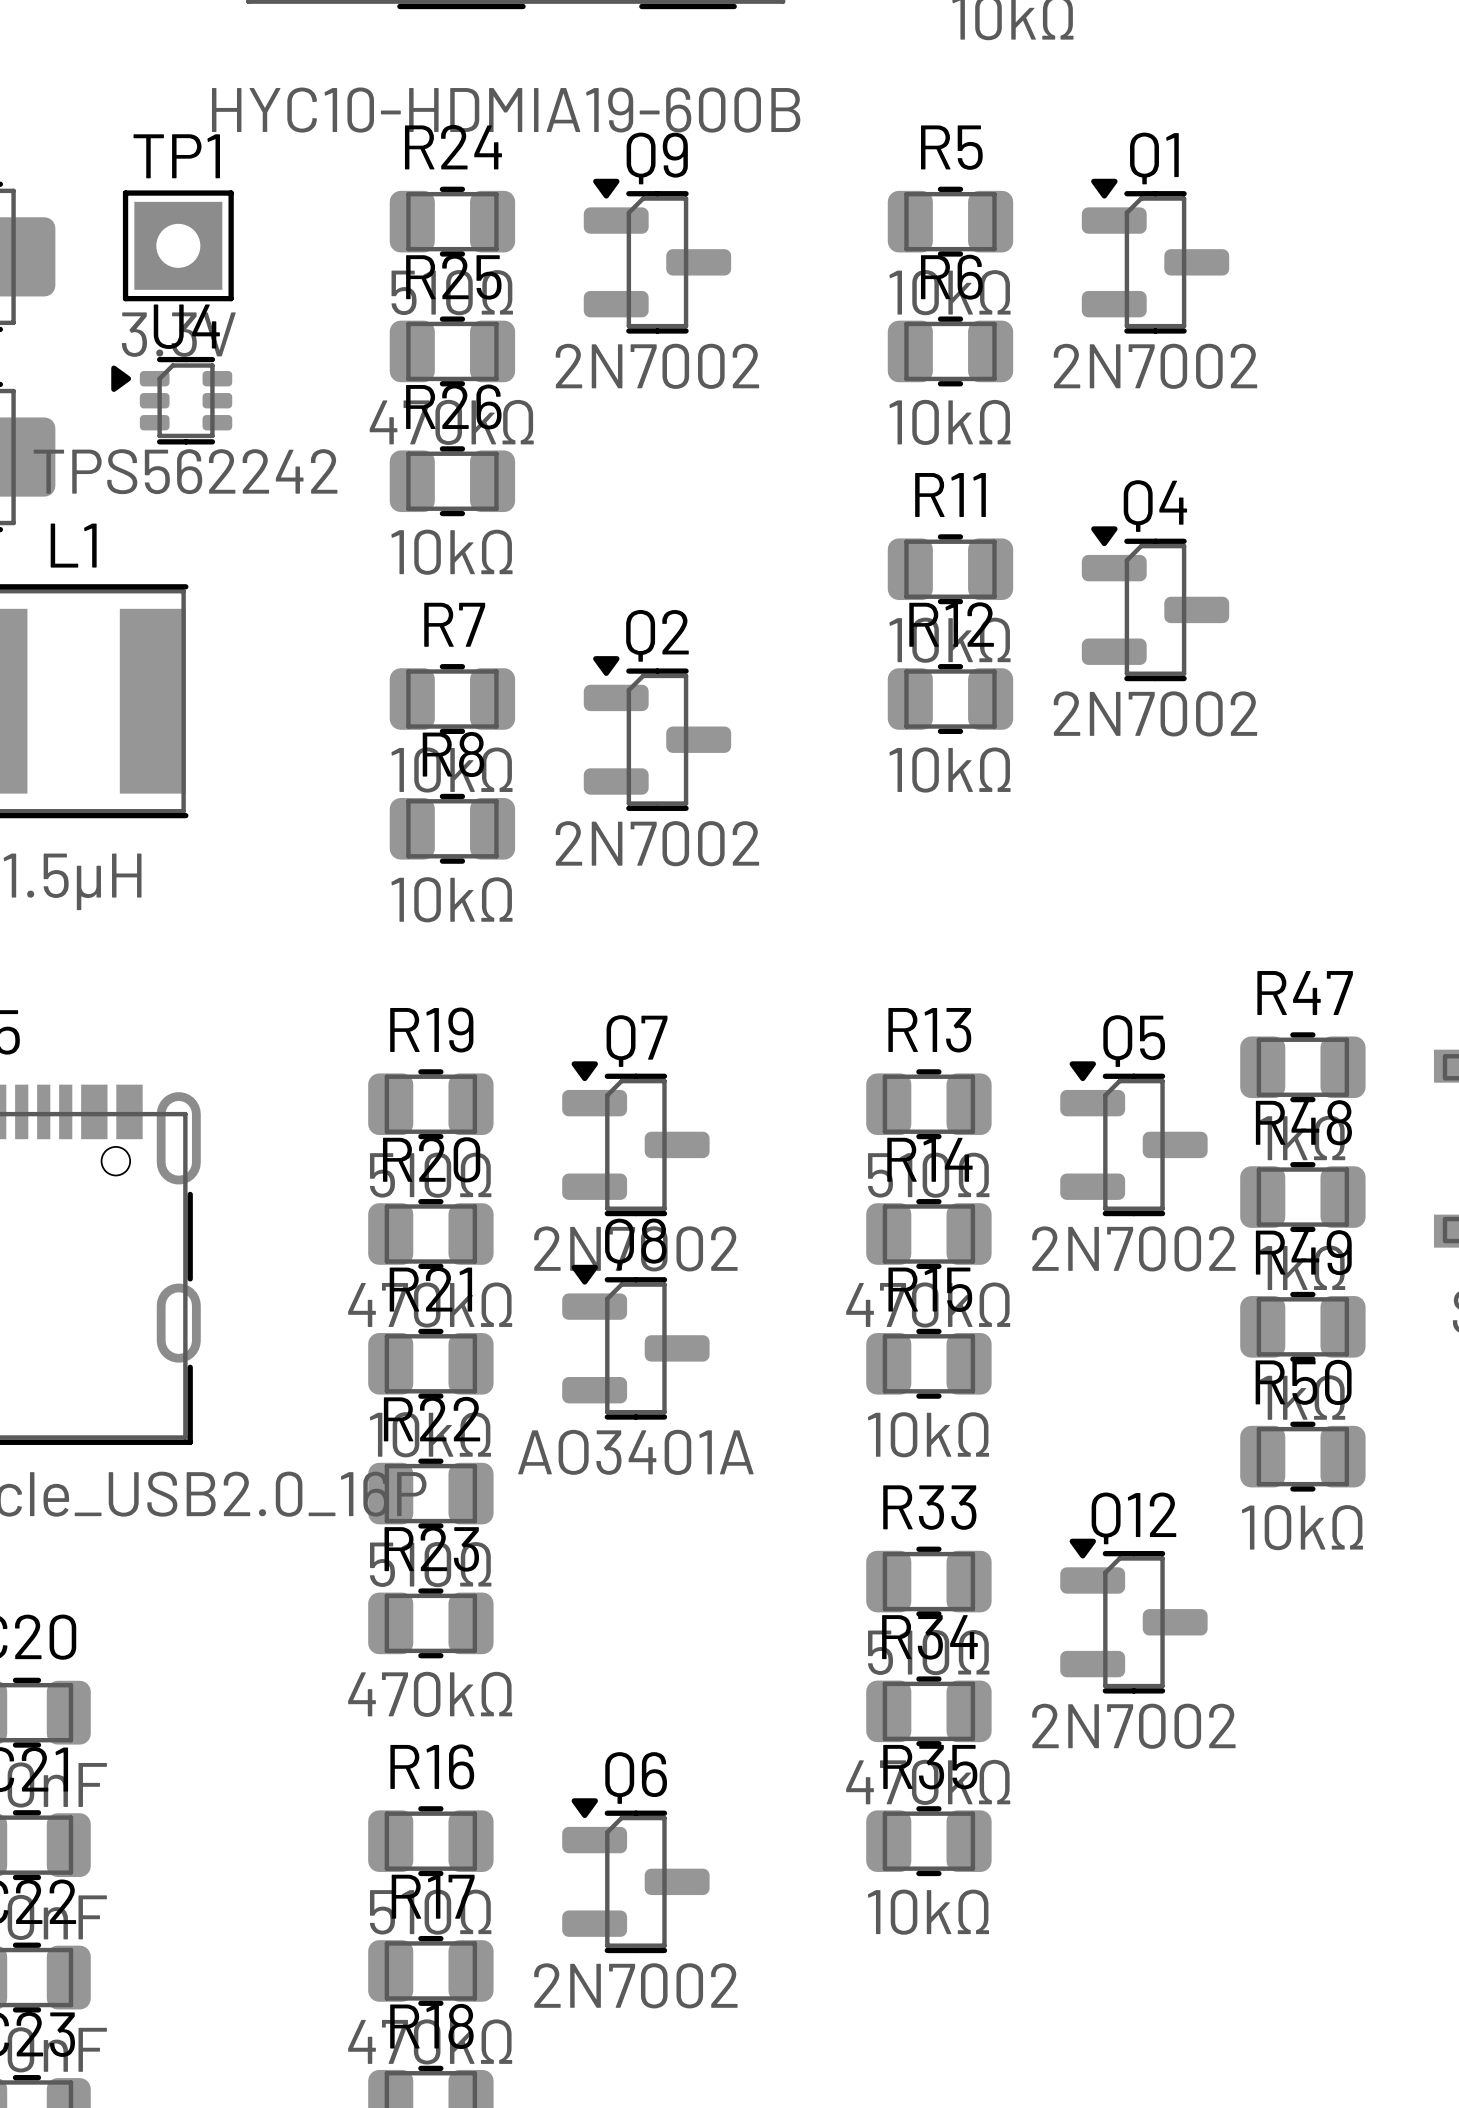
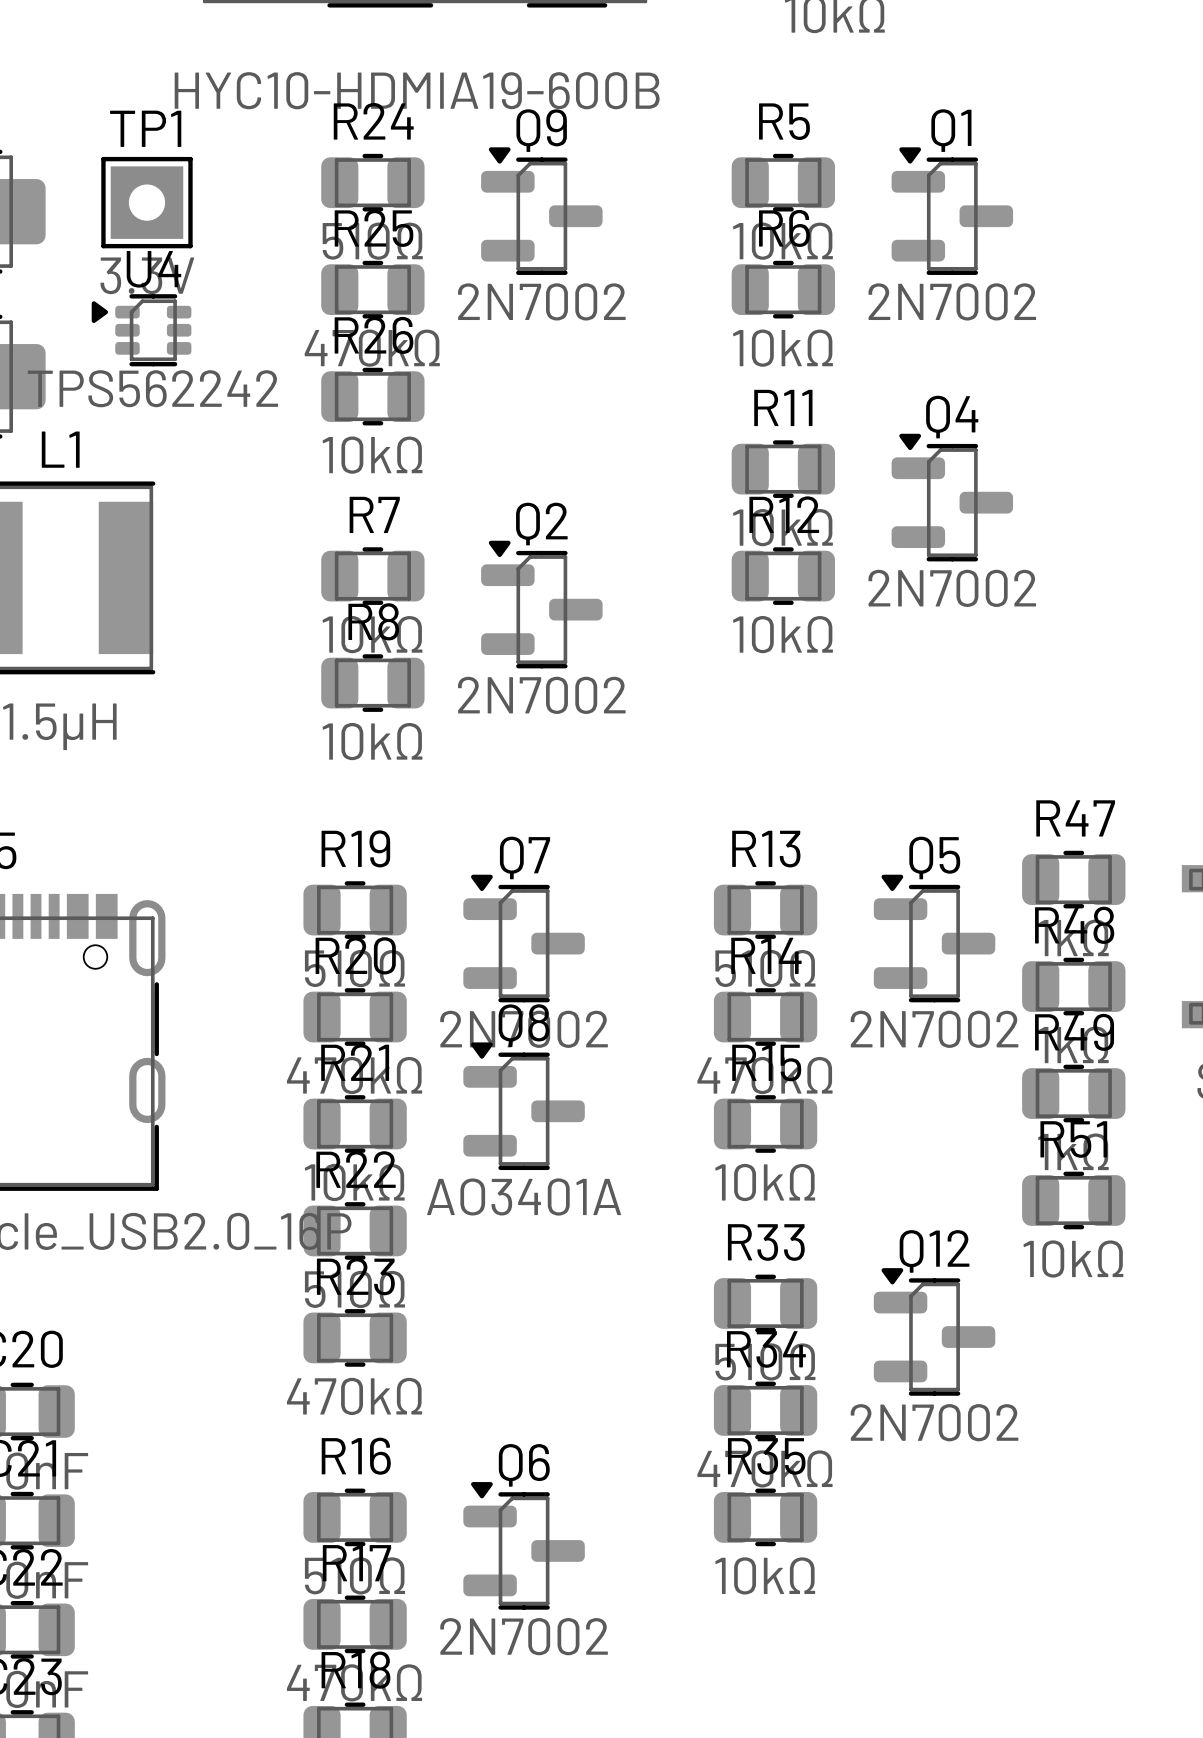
R50 name: R50 (1303, 1382) -> R51 (1073, 1139)

